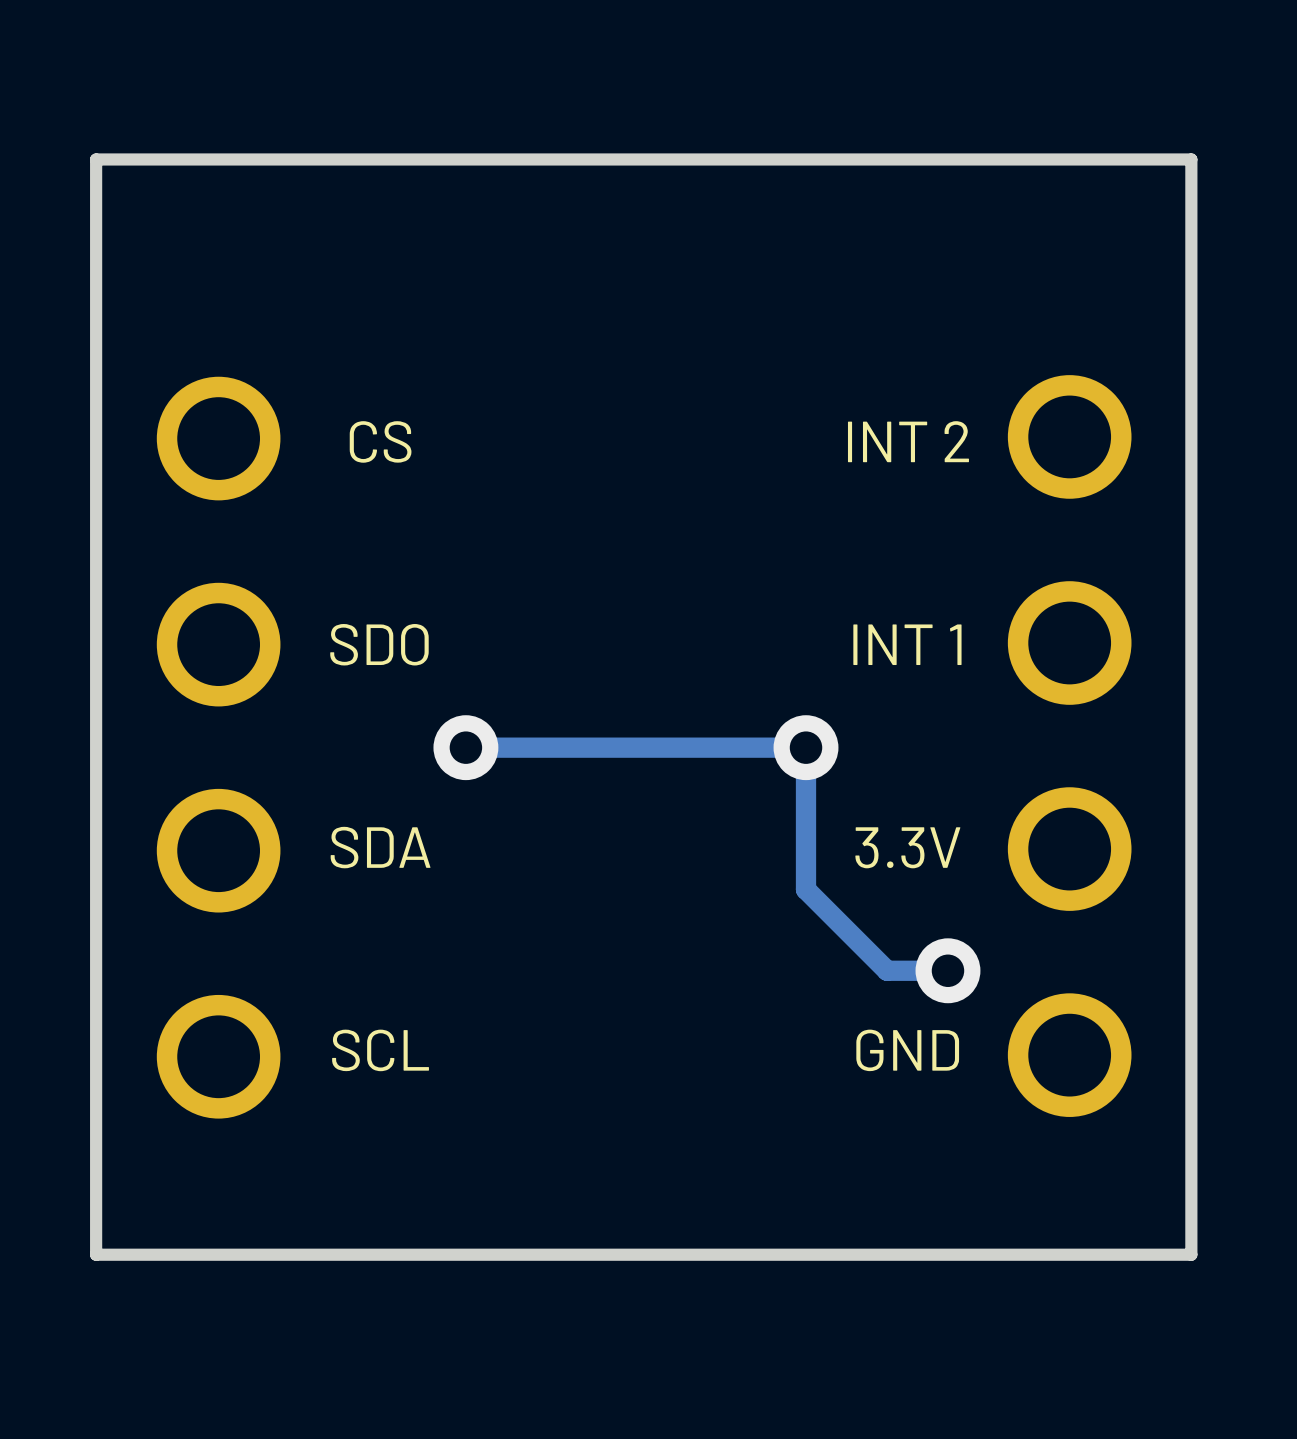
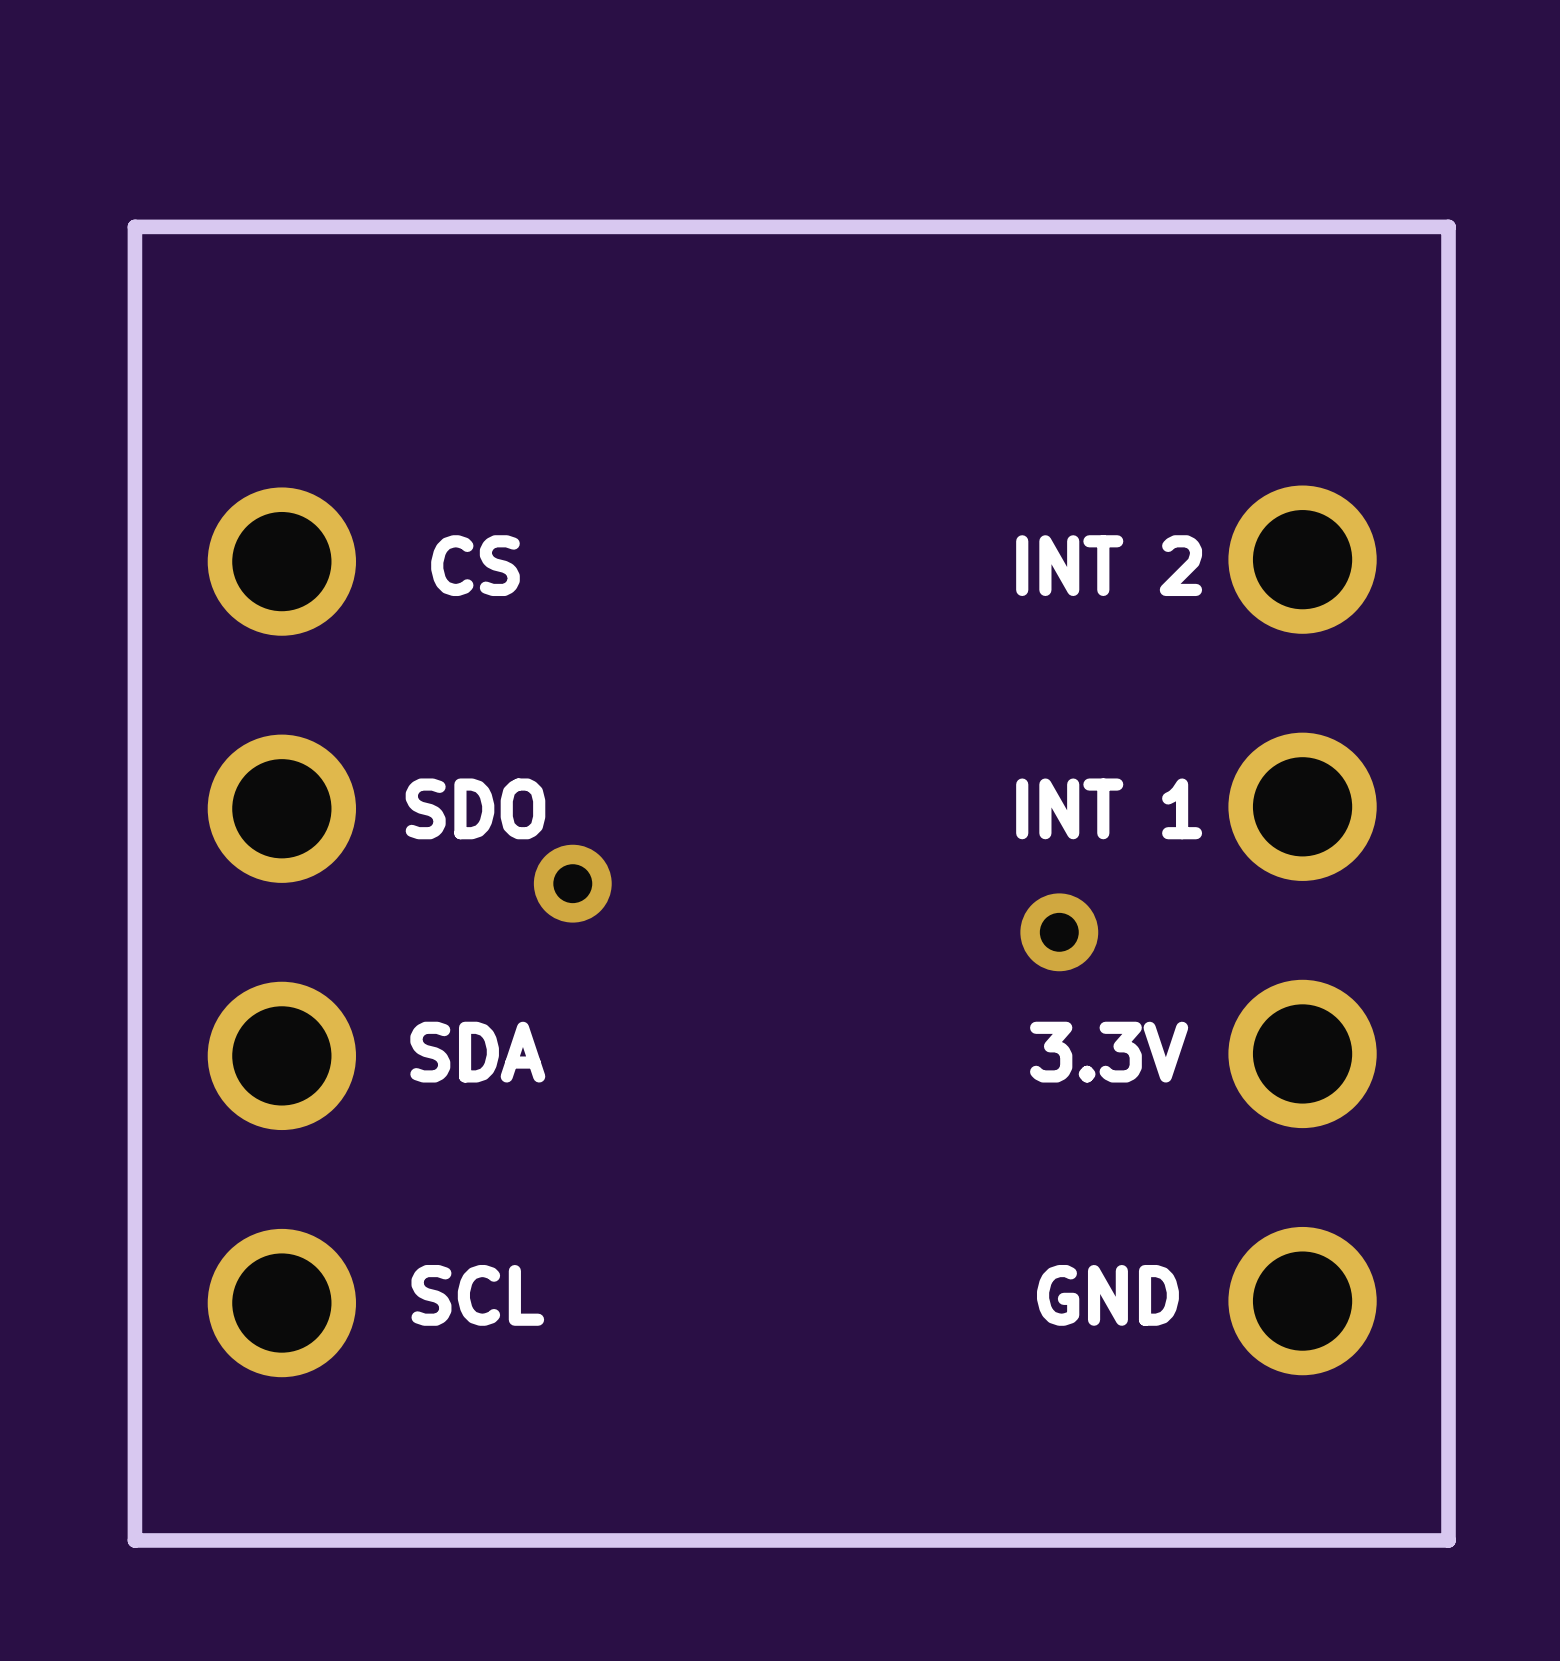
track: (465, 747) (806, 747) (806, 889) (887, 970) (947, 970) -> none
via position: (465, 747) -> (572, 883)
via position: (806, 747) -> (1059, 932)
via: (947, 970) -> none

